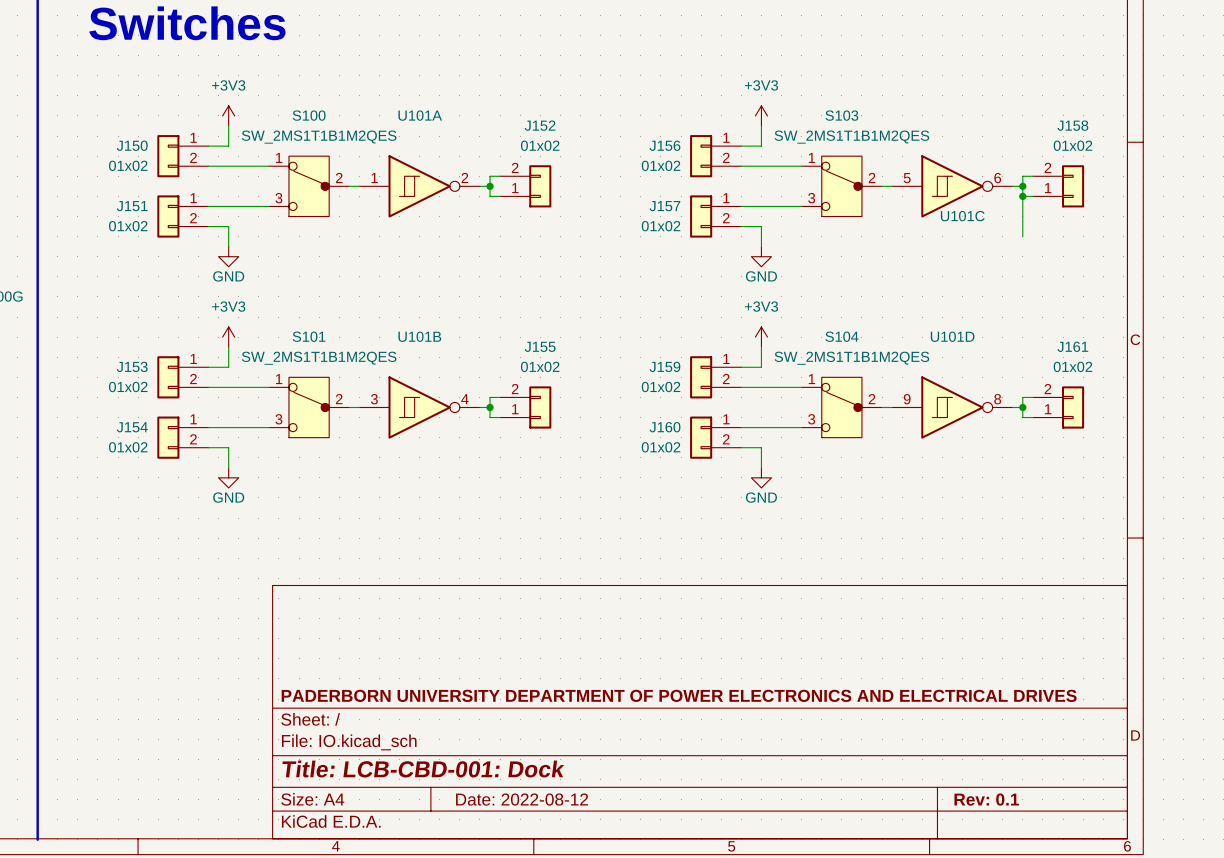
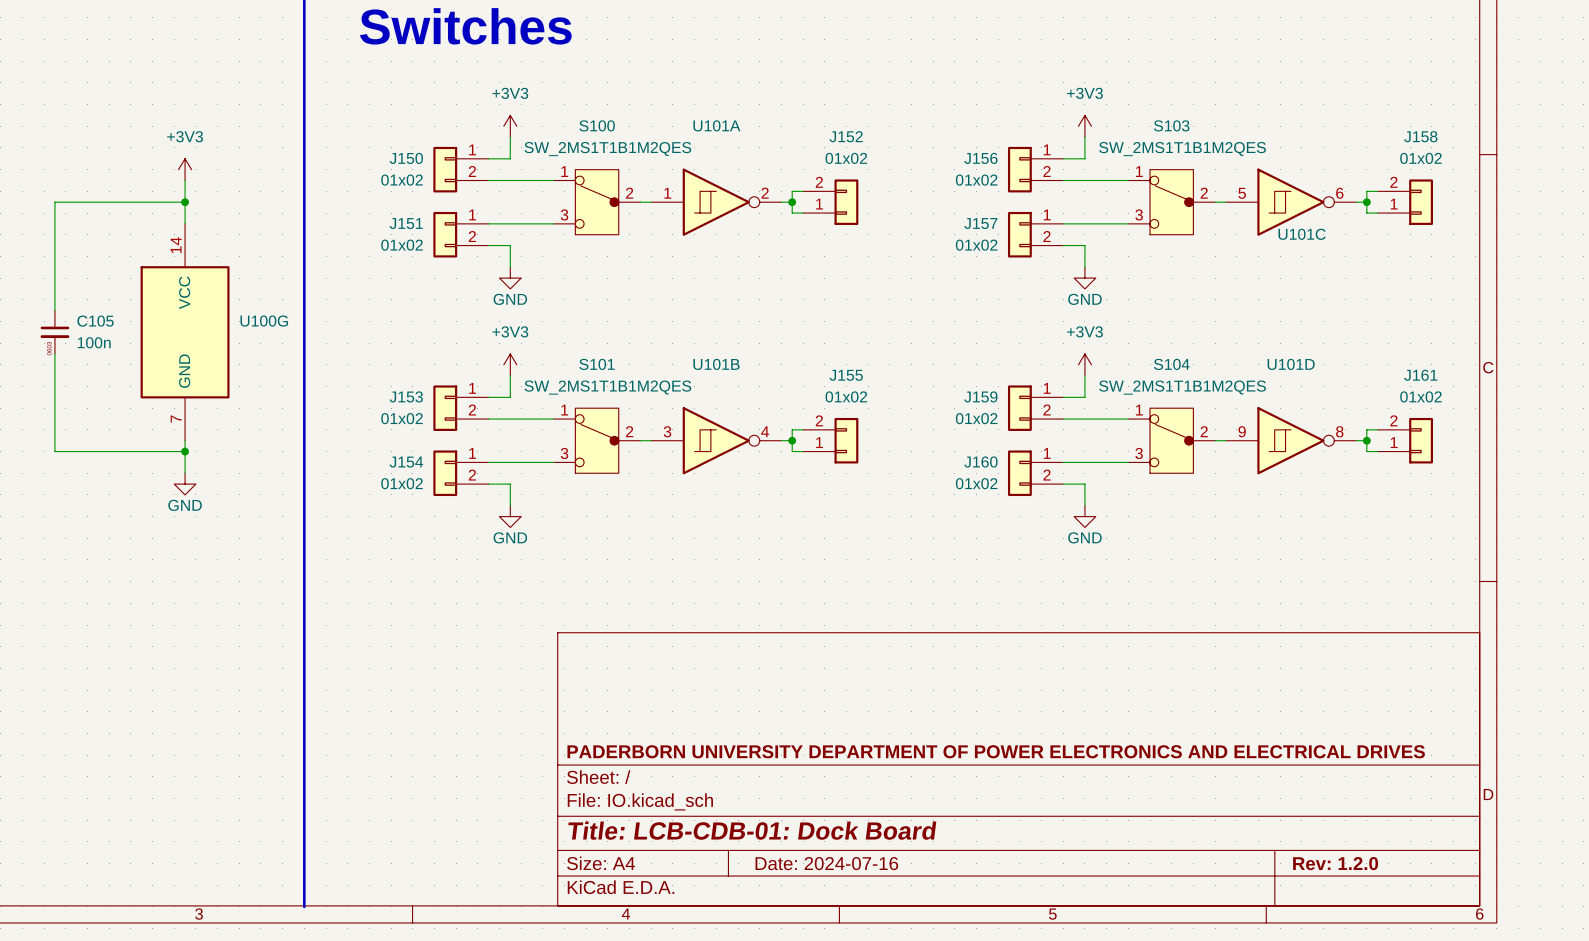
wire: (1022, 196) (1022, 236) -> none
junction: (1022, 196) -> none
title block: Title: LCB-CBD-001: Dock (423, 769) -> Title: LCB-CDB-01: Dock Board (752, 830)
title block: Date: 2022-08-12 (522, 799) -> Date: 2024-07-16 (826, 863)
title block: Rev: 0.1 (986, 799) -> Rev: 1.2.0 (1335, 863)

